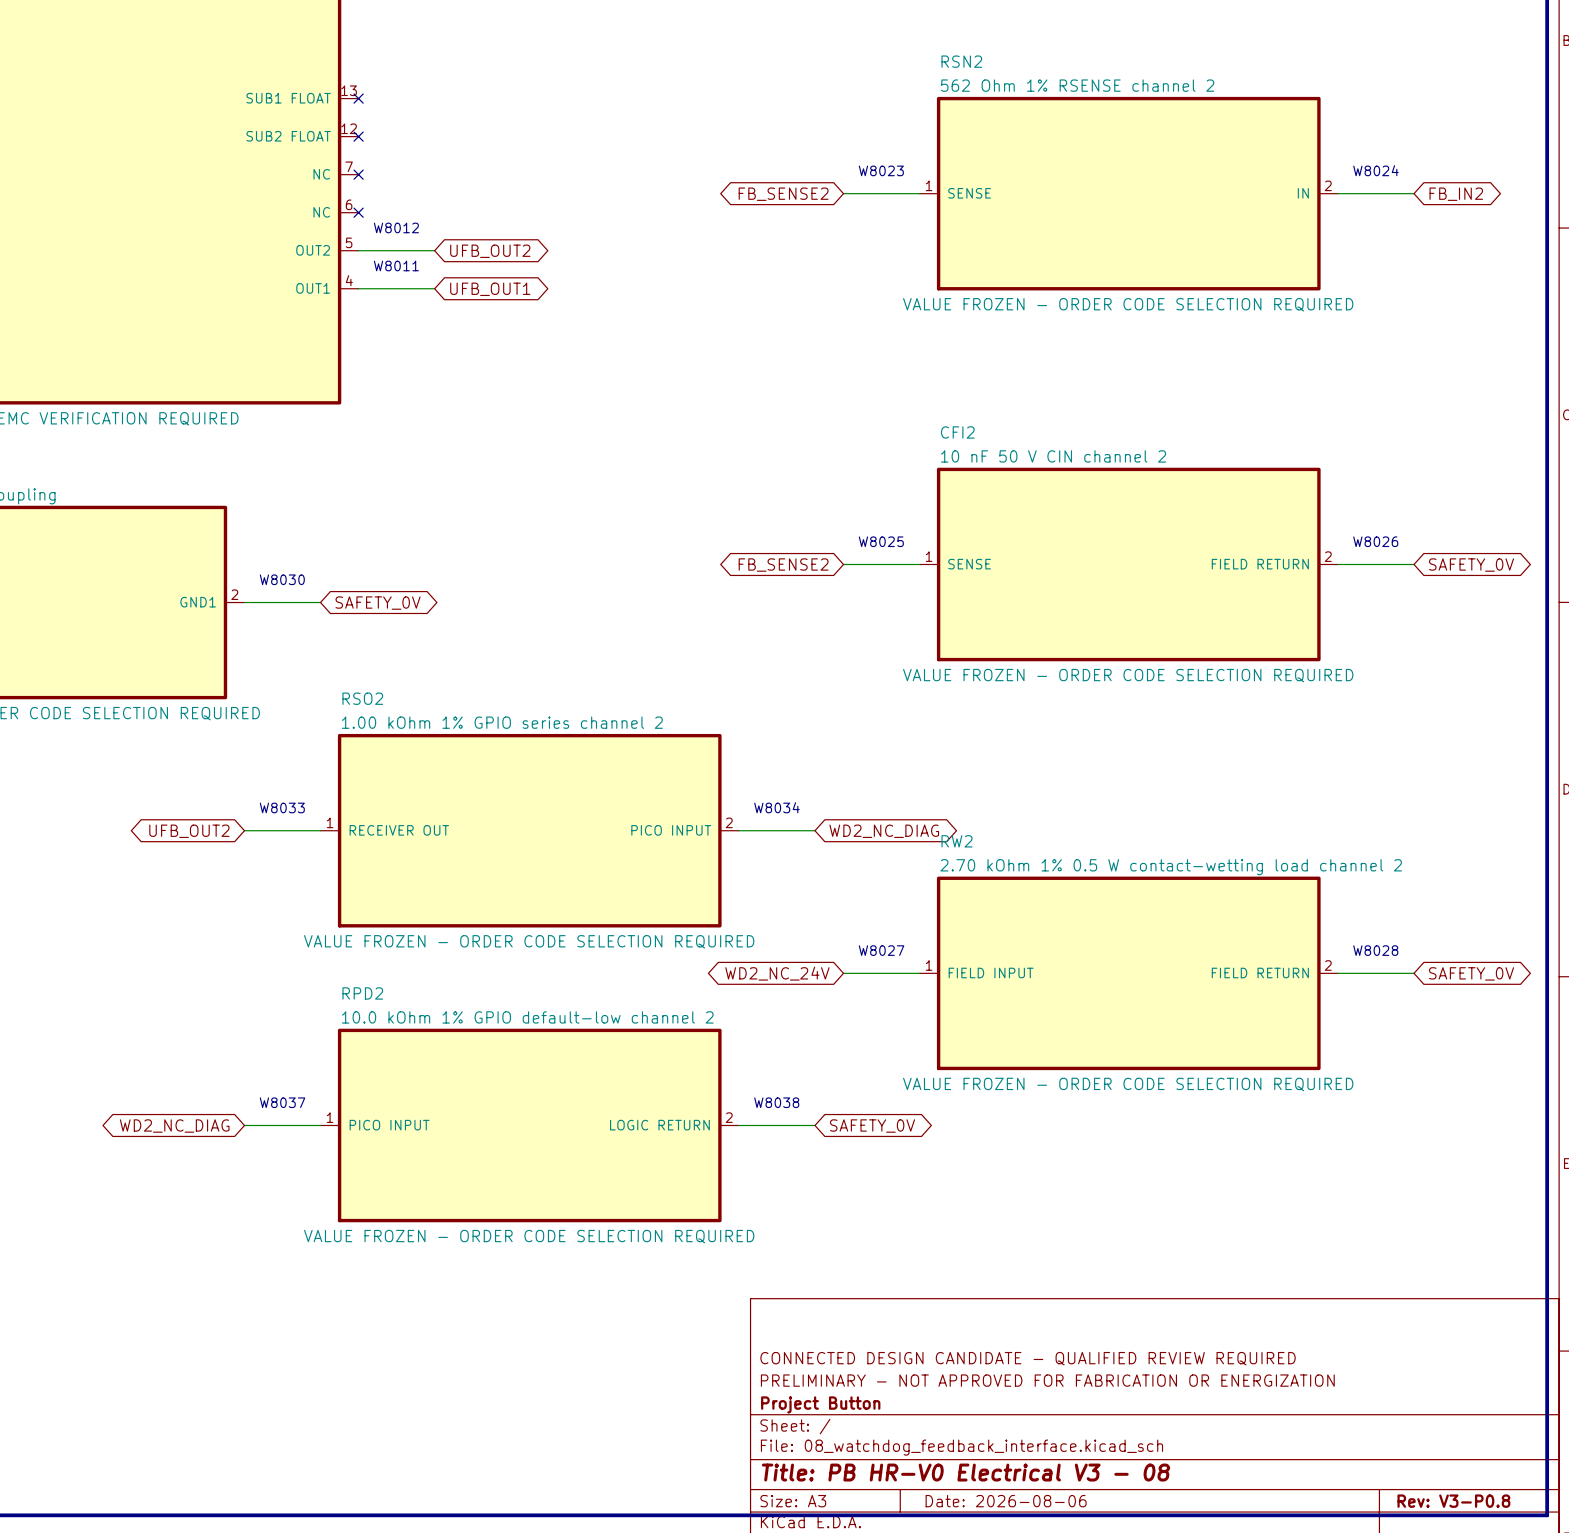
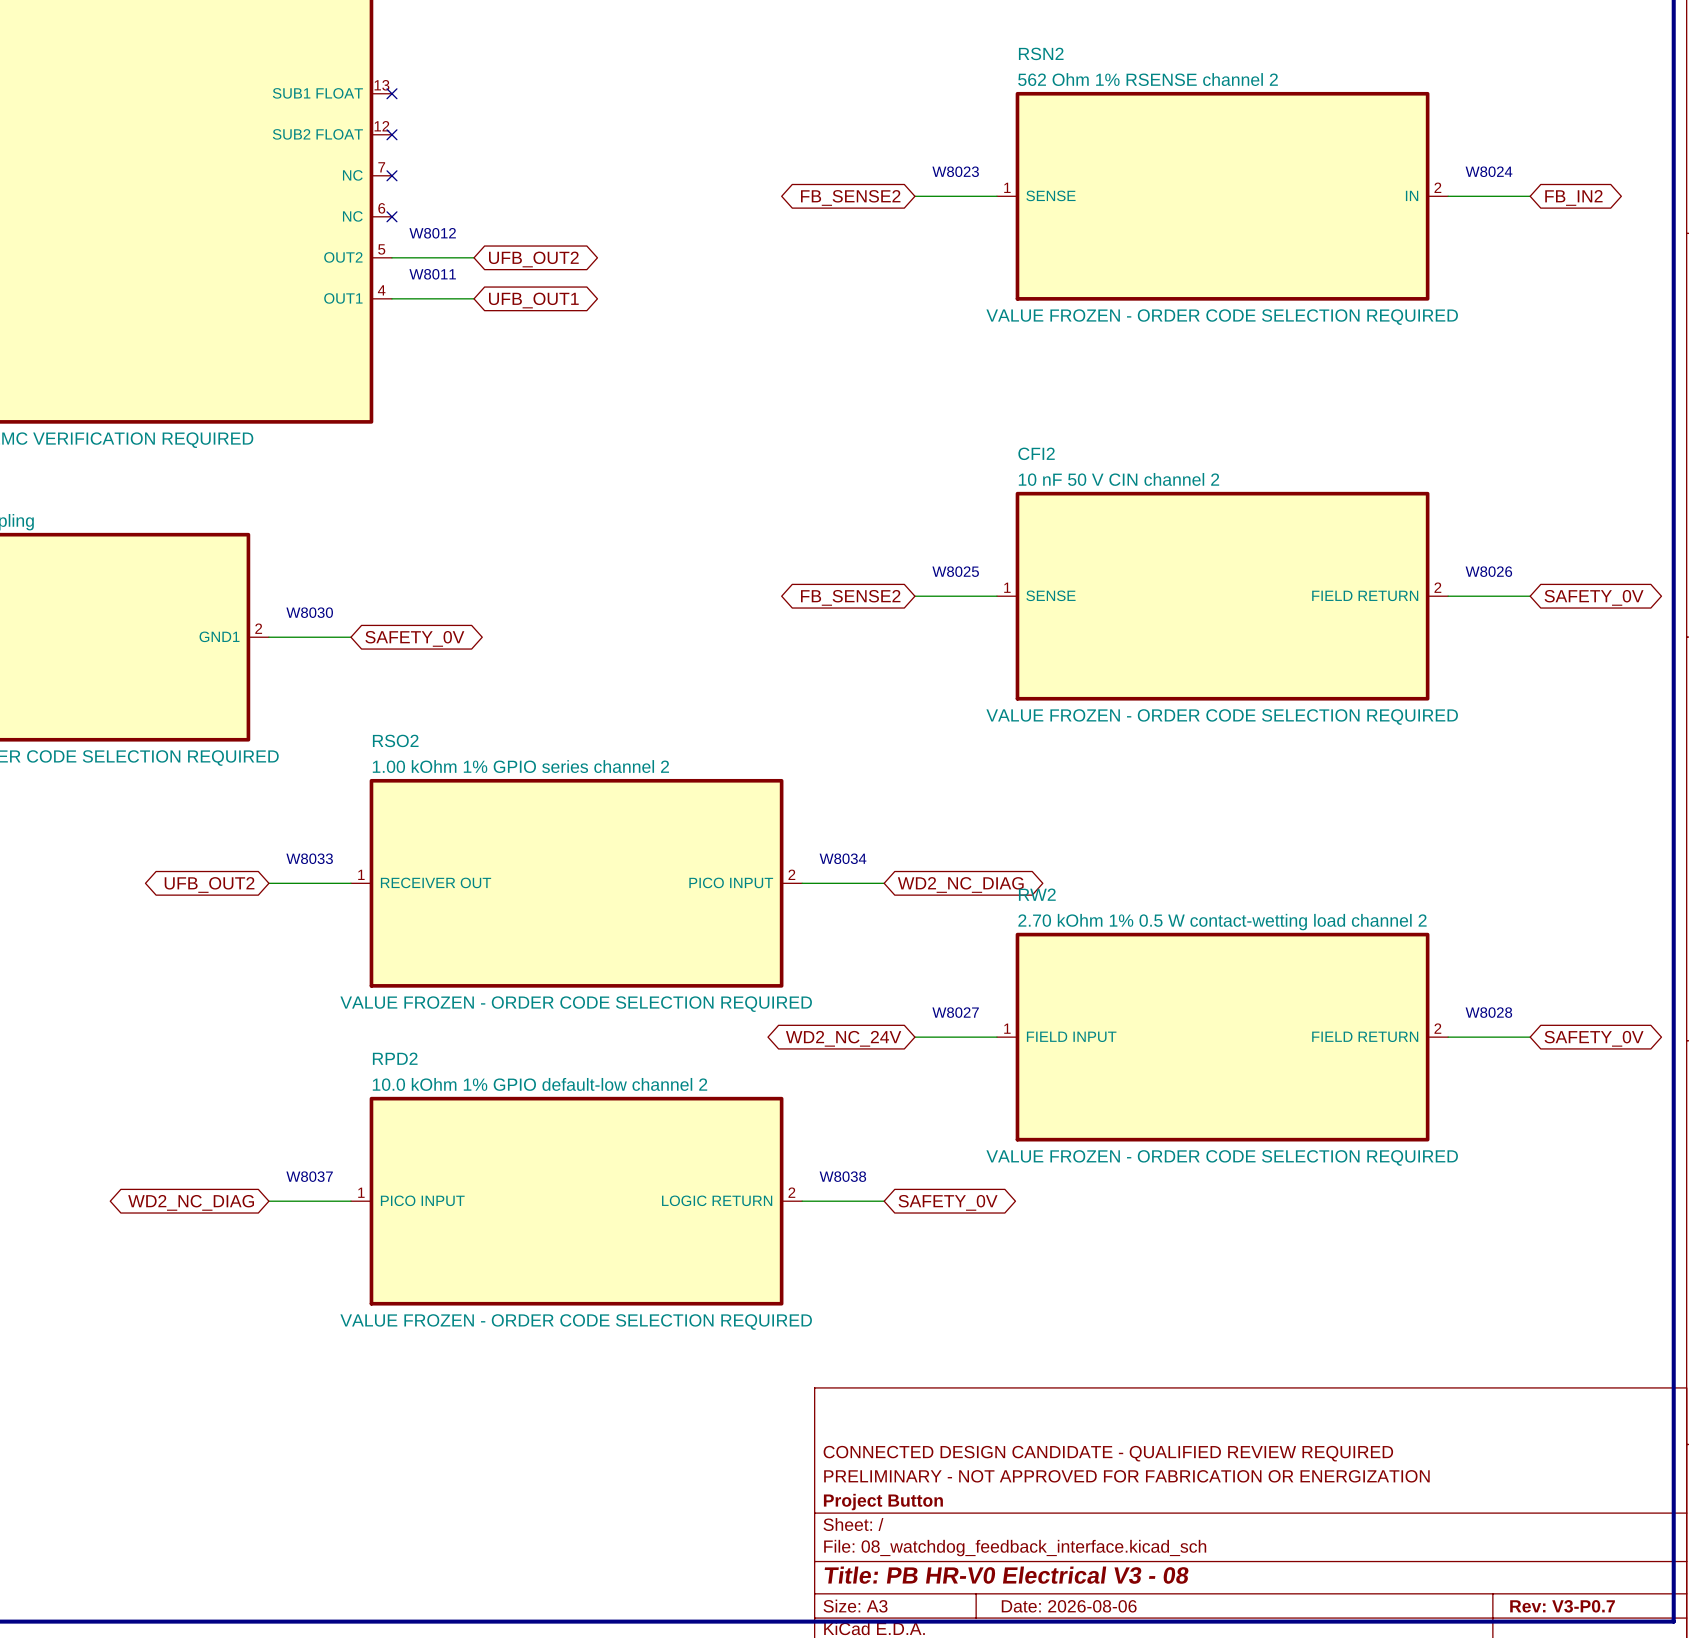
title block: Rev: V3-P0.8 (1453, 1501) -> Rev: V3-P0.7 (1562, 1606)

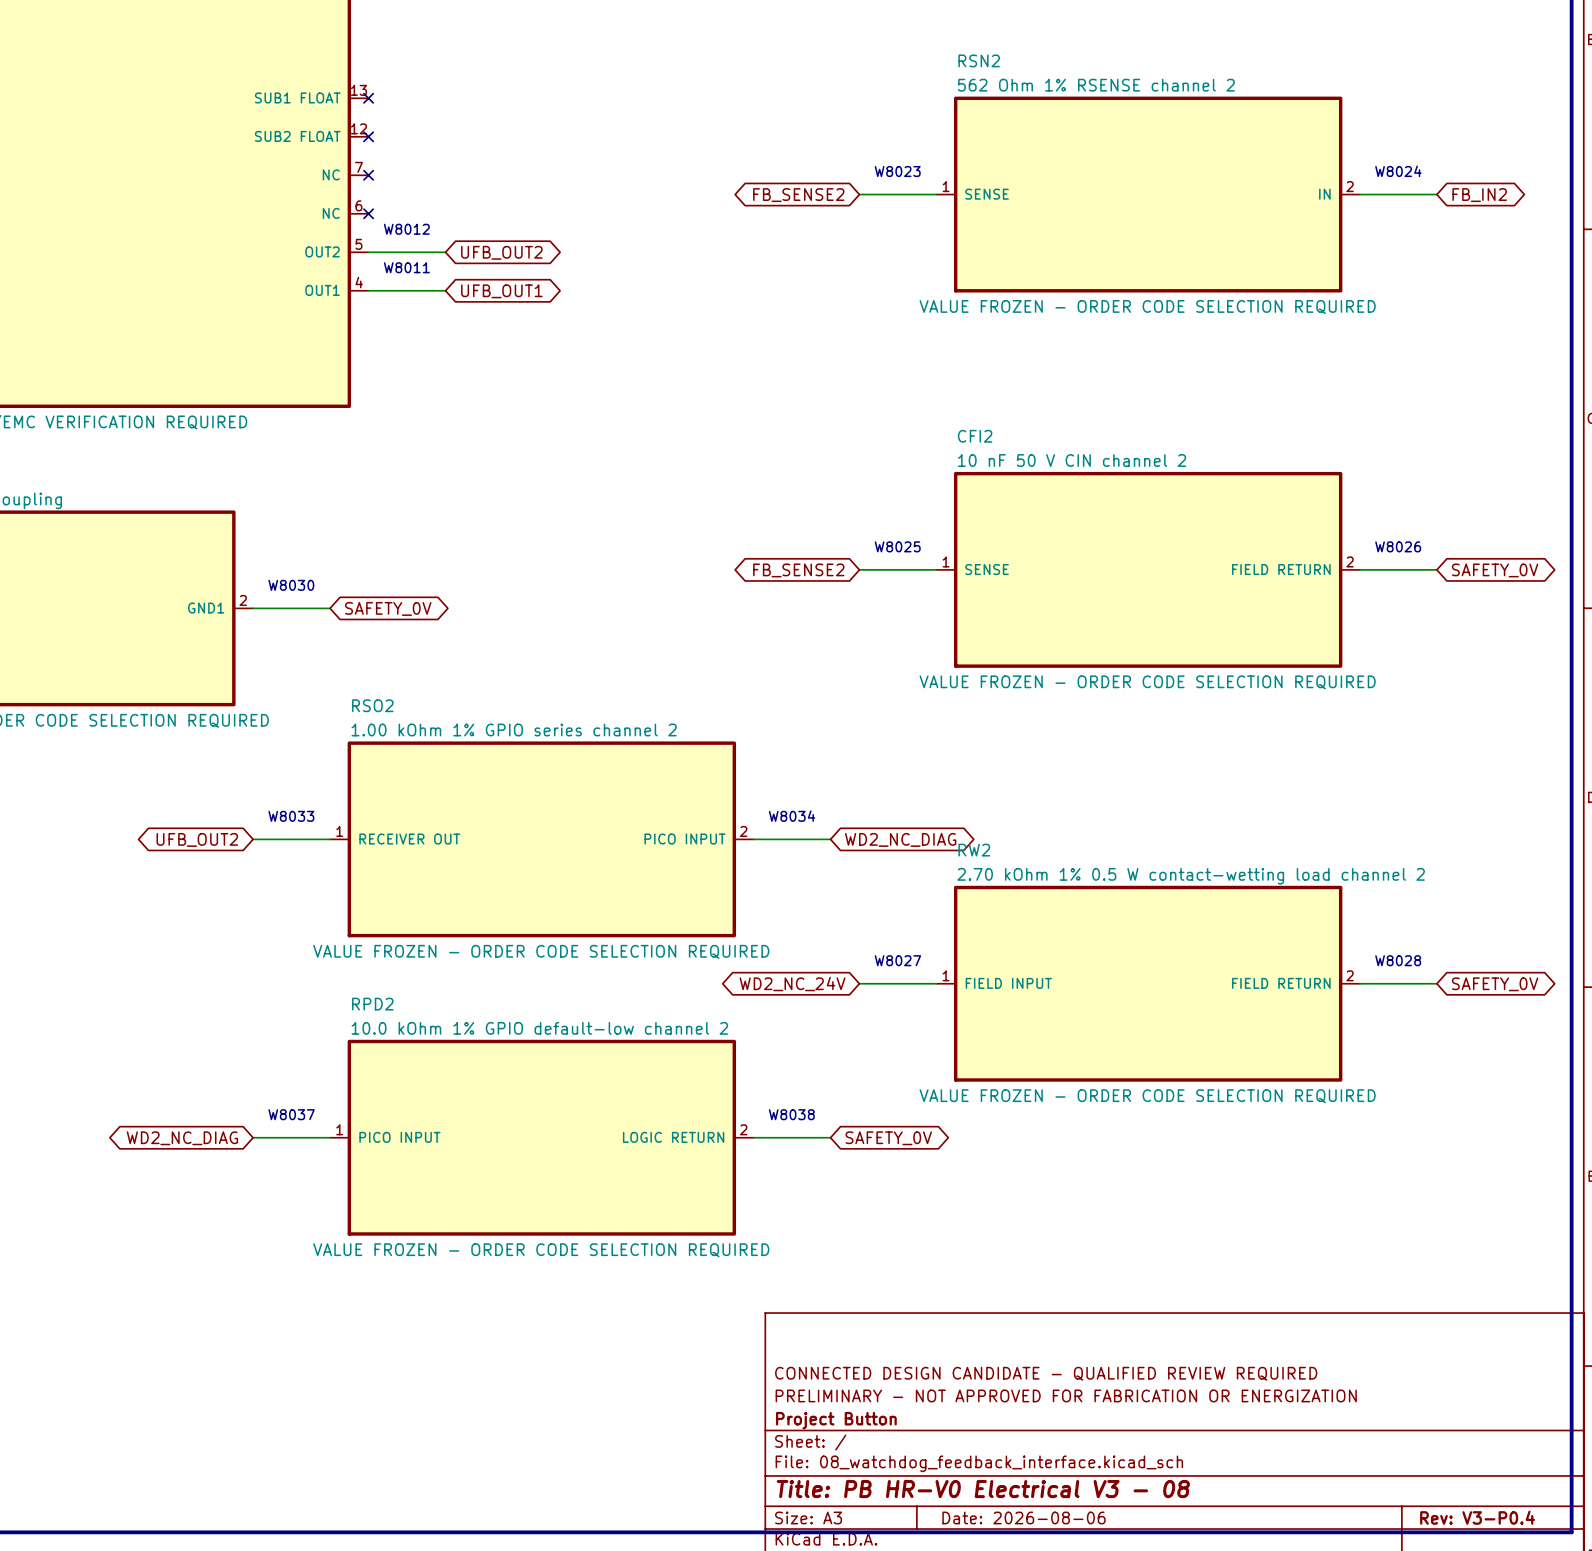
title block: Rev: V3-P0.7 (1562, 1606) -> Rev: V3-P0.4 (1477, 1517)

